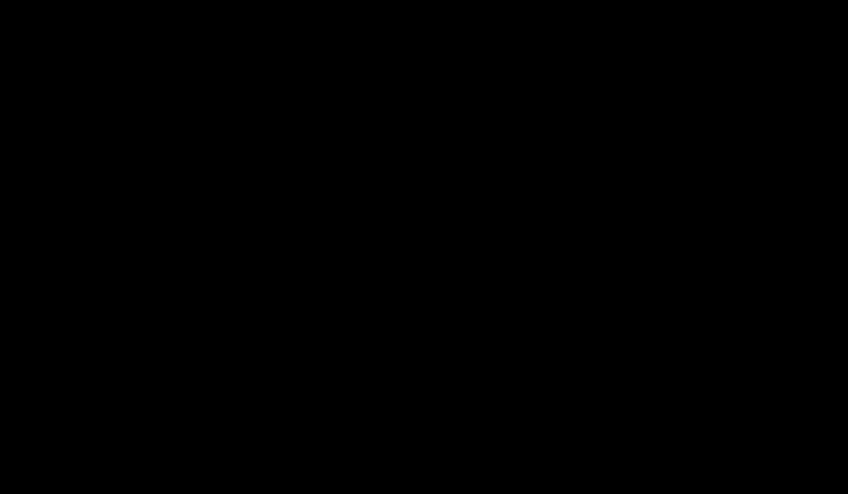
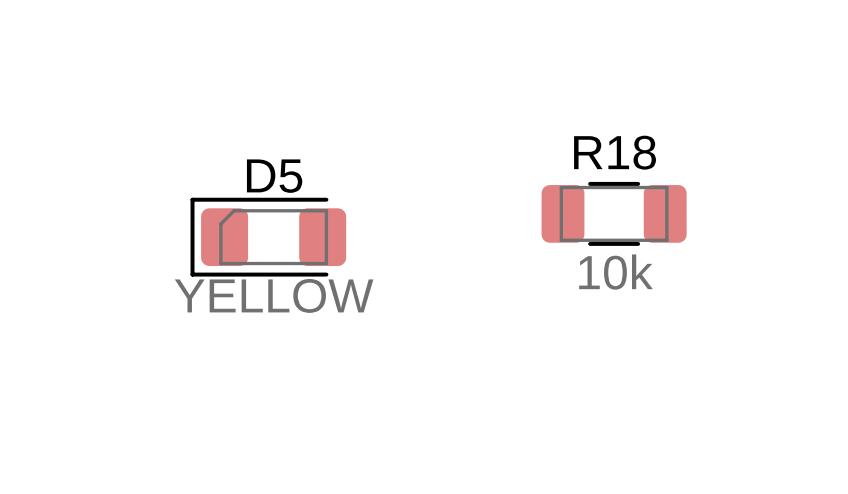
R18: none -> 10k (614, 213)
D5: none -> YELLOW (268, 237)

